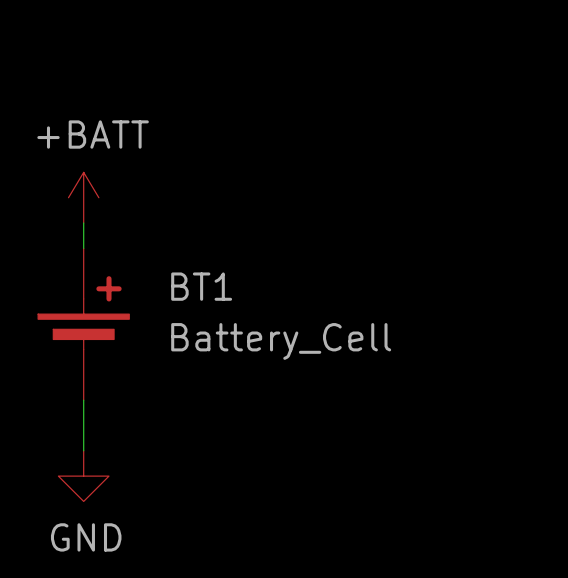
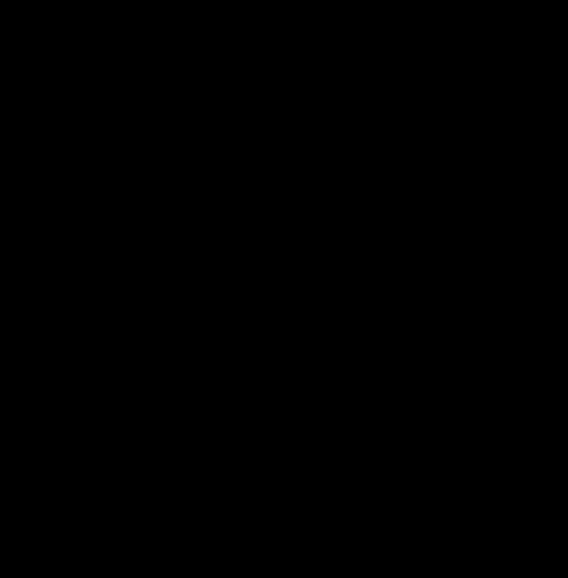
power symbol: +BATT (83, 197) -> none
wire: (83, 223) (83, 248) -> none
BT1: Battery_Cell (83, 324) -> none
wire: (83, 400) (83, 450) -> none
power symbol: GND (83, 476) -> none

